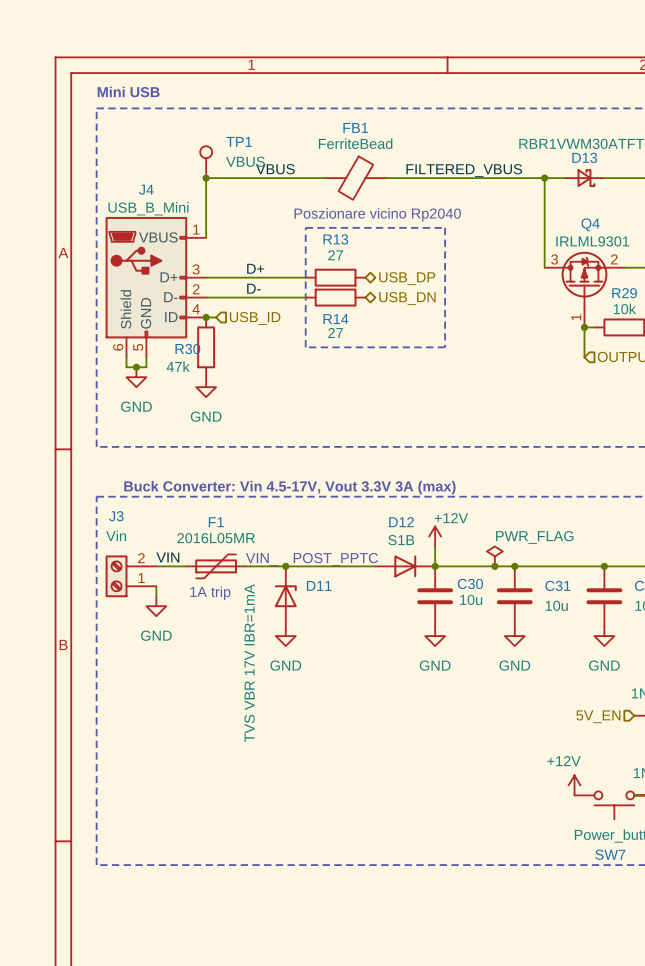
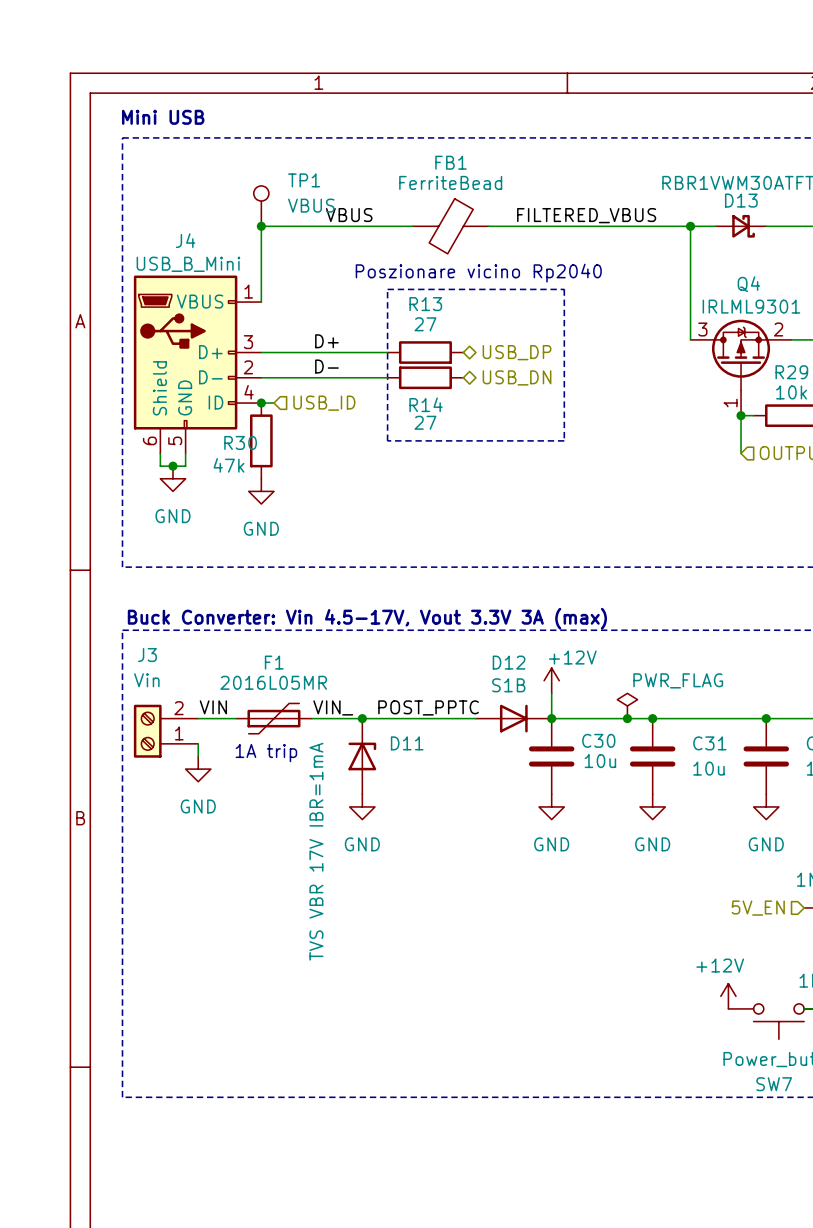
label: none -> VIN_ (333, 707)
label: none -> POST_PPTC (428, 707)
text: VIN_ (262, 559) -> none
text: POST_PPTC (335, 559) -> none

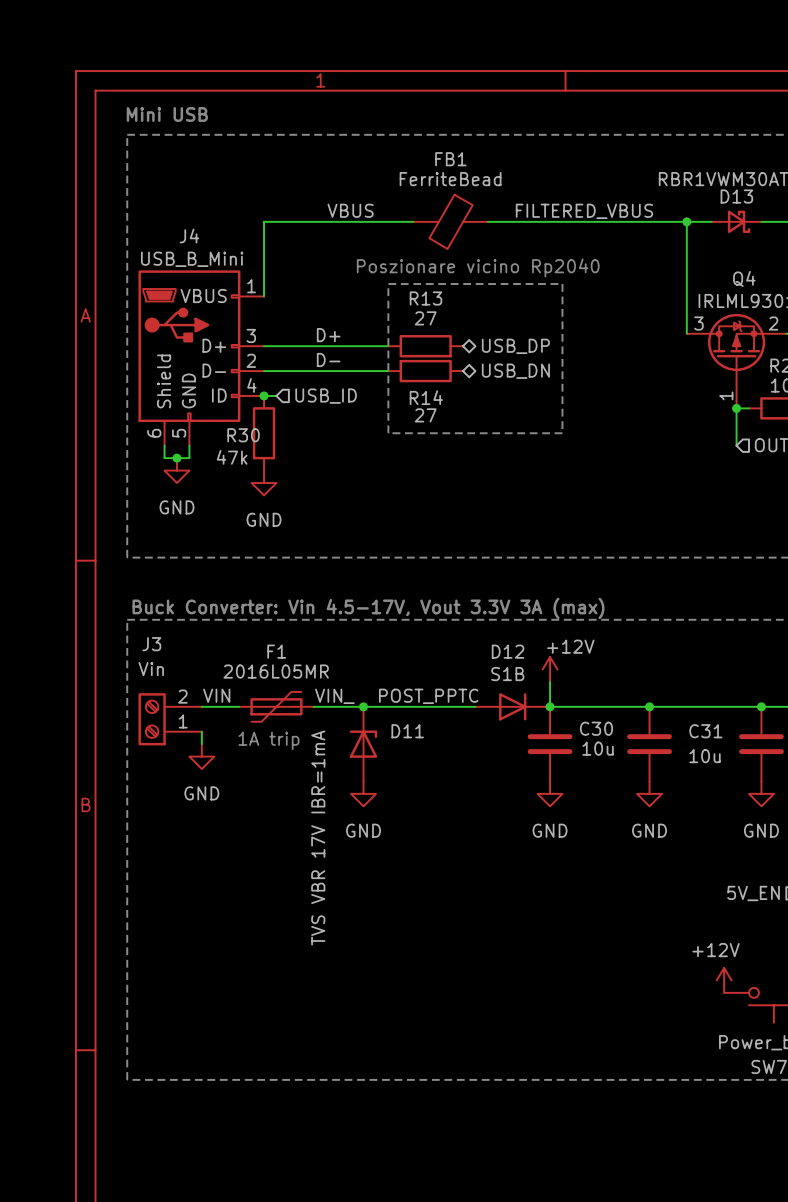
TP1: VBUS (261, 206) -> none
junction: (261, 226) -> none
power symbol: PWR_FLAG (627, 705) -> none
junction: (627, 718) -> none

